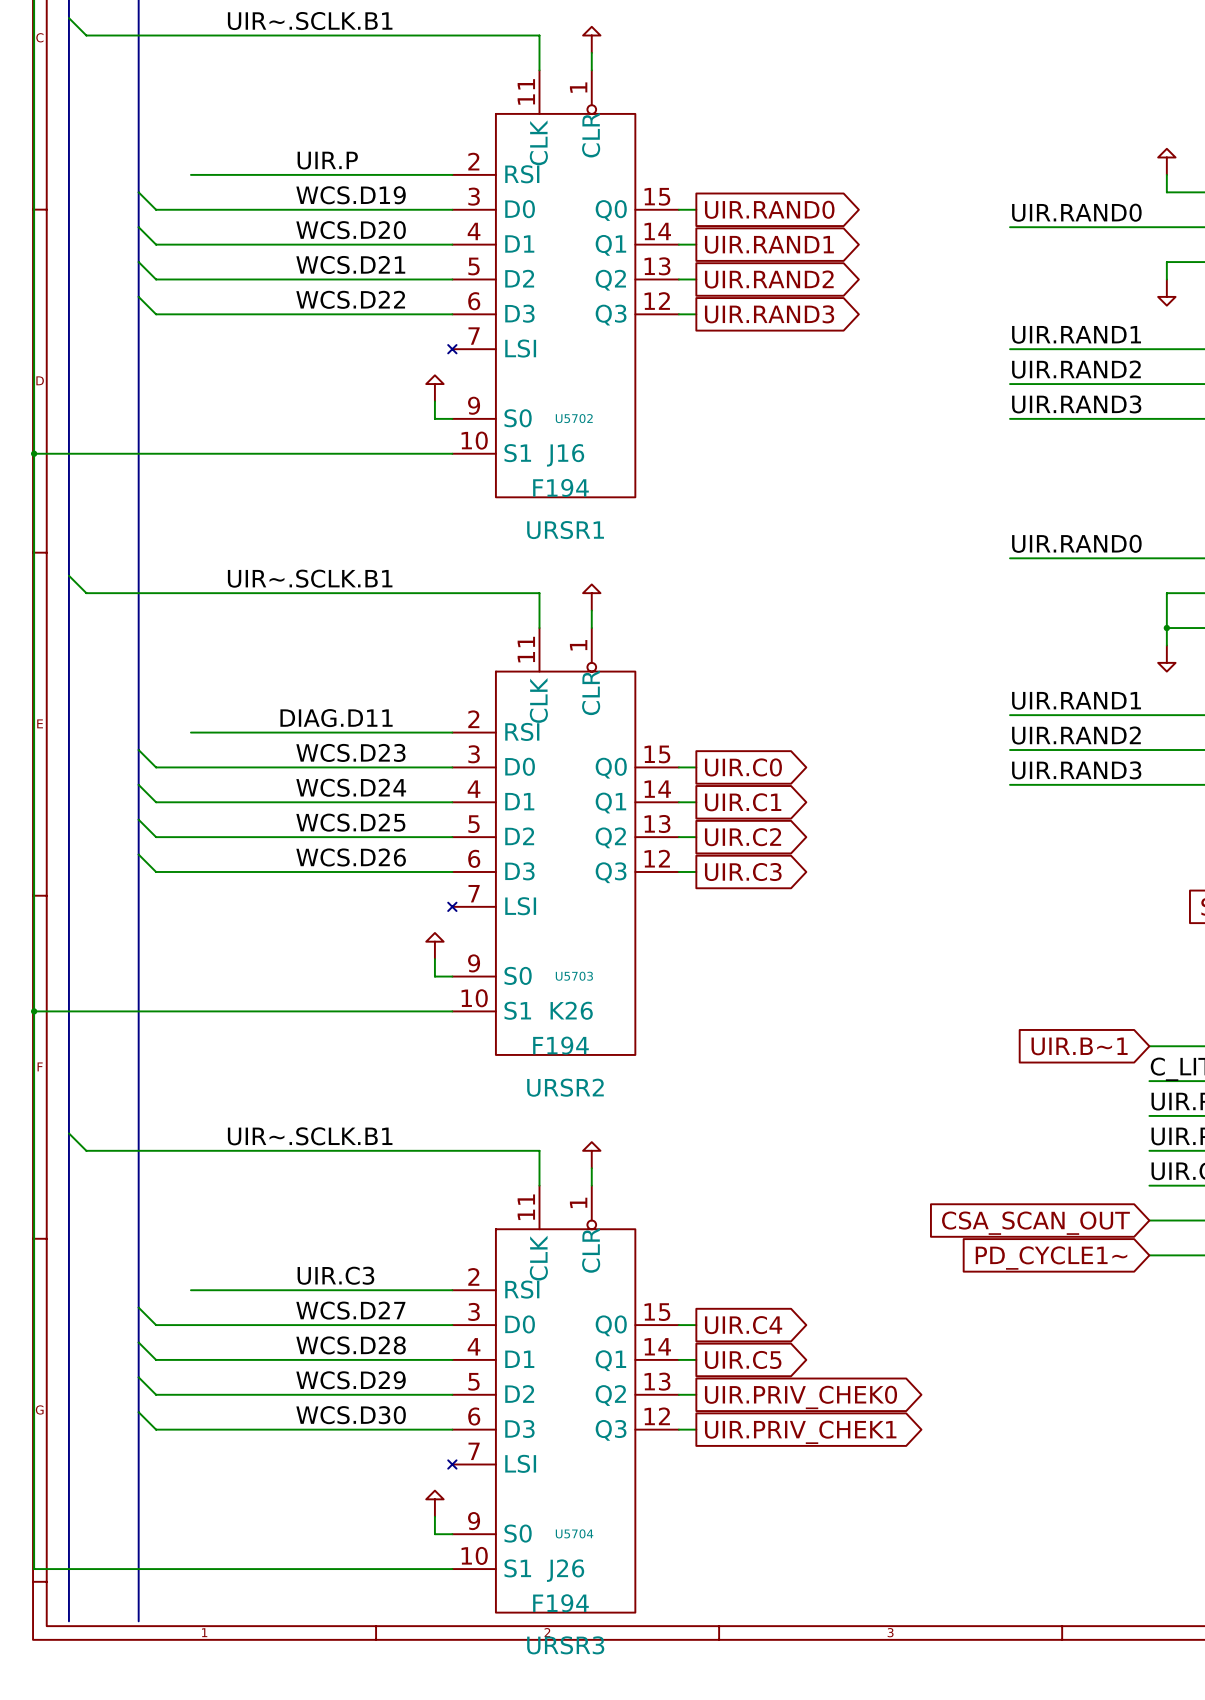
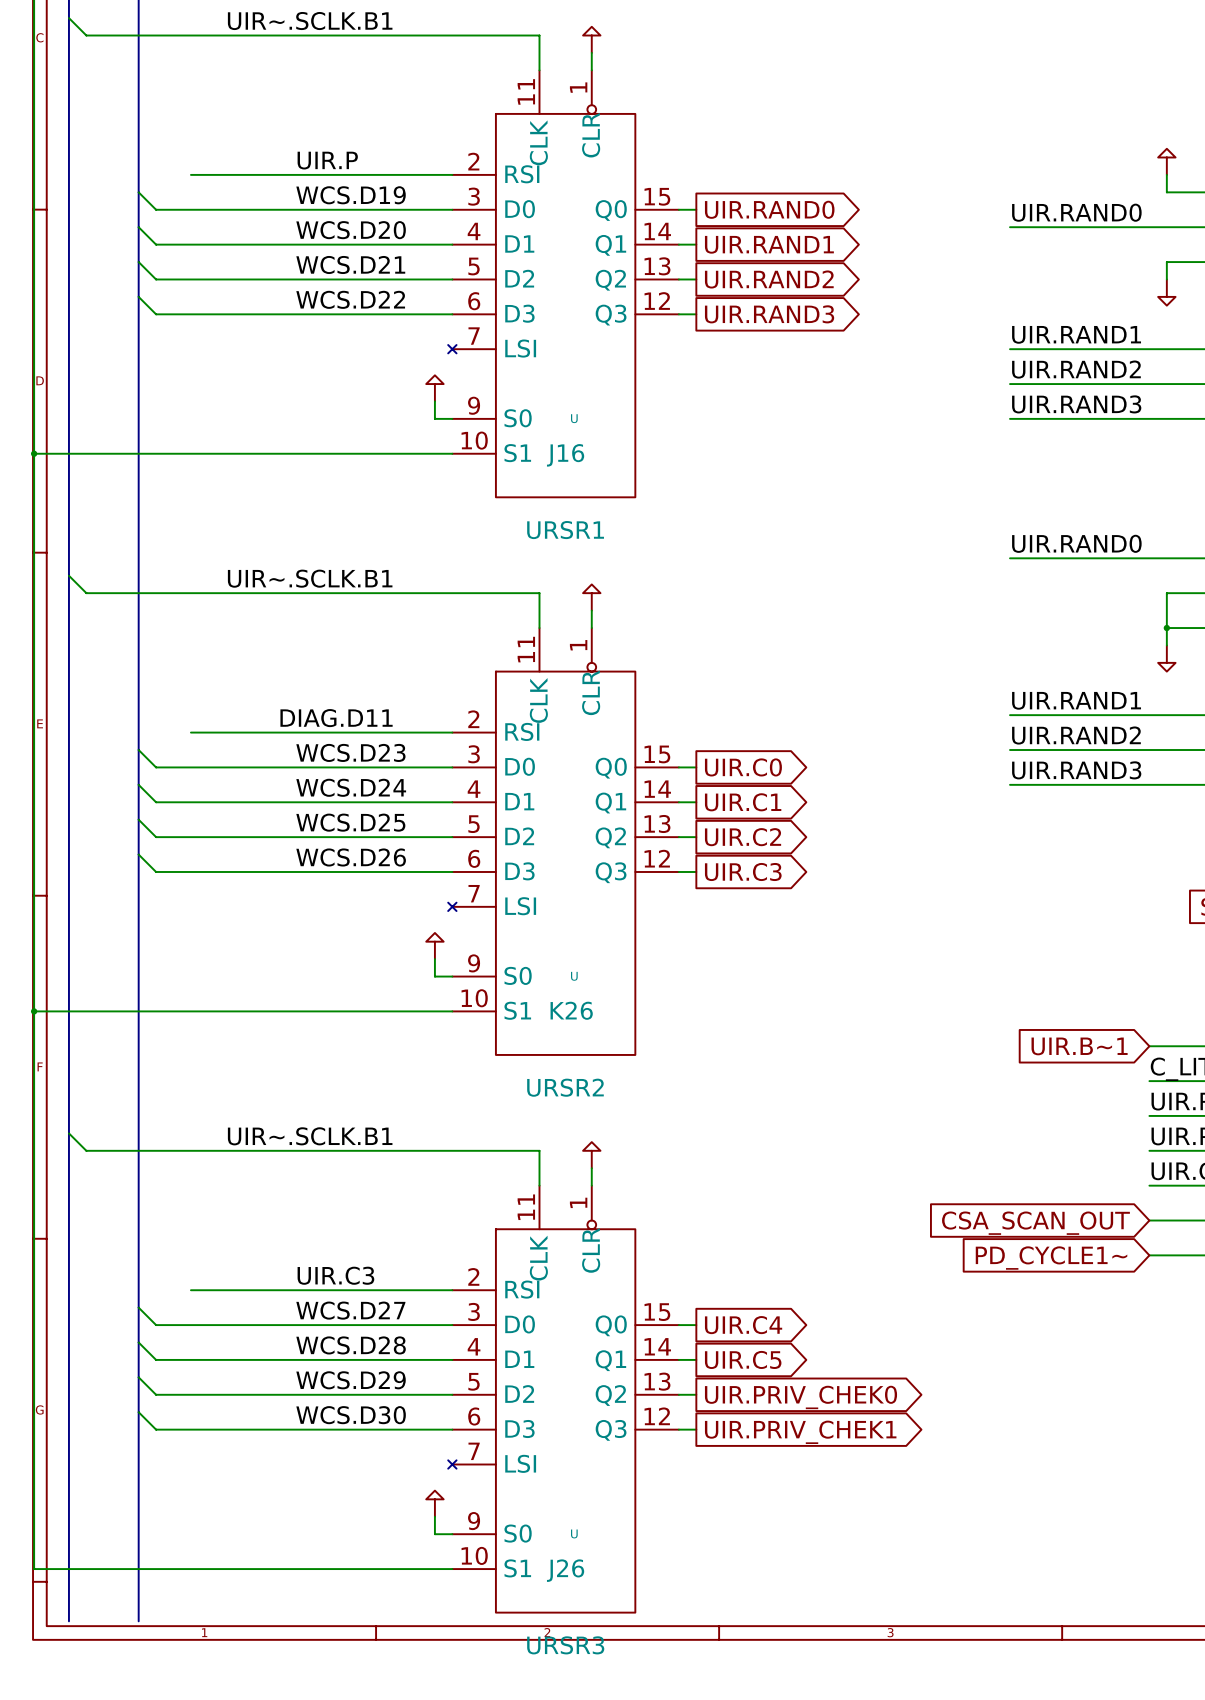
U5702 name: U5702 (574, 418) -> U (574, 418)
U5702 value: F194 (560, 487) -> none
U5703 name: U5703 (574, 976) -> U (574, 976)
U5703 value: F194 (560, 1045) -> none
U5704 name: U5704 (574, 1533) -> U (574, 1533)
U5704 value: F194 (560, 1603) -> none

